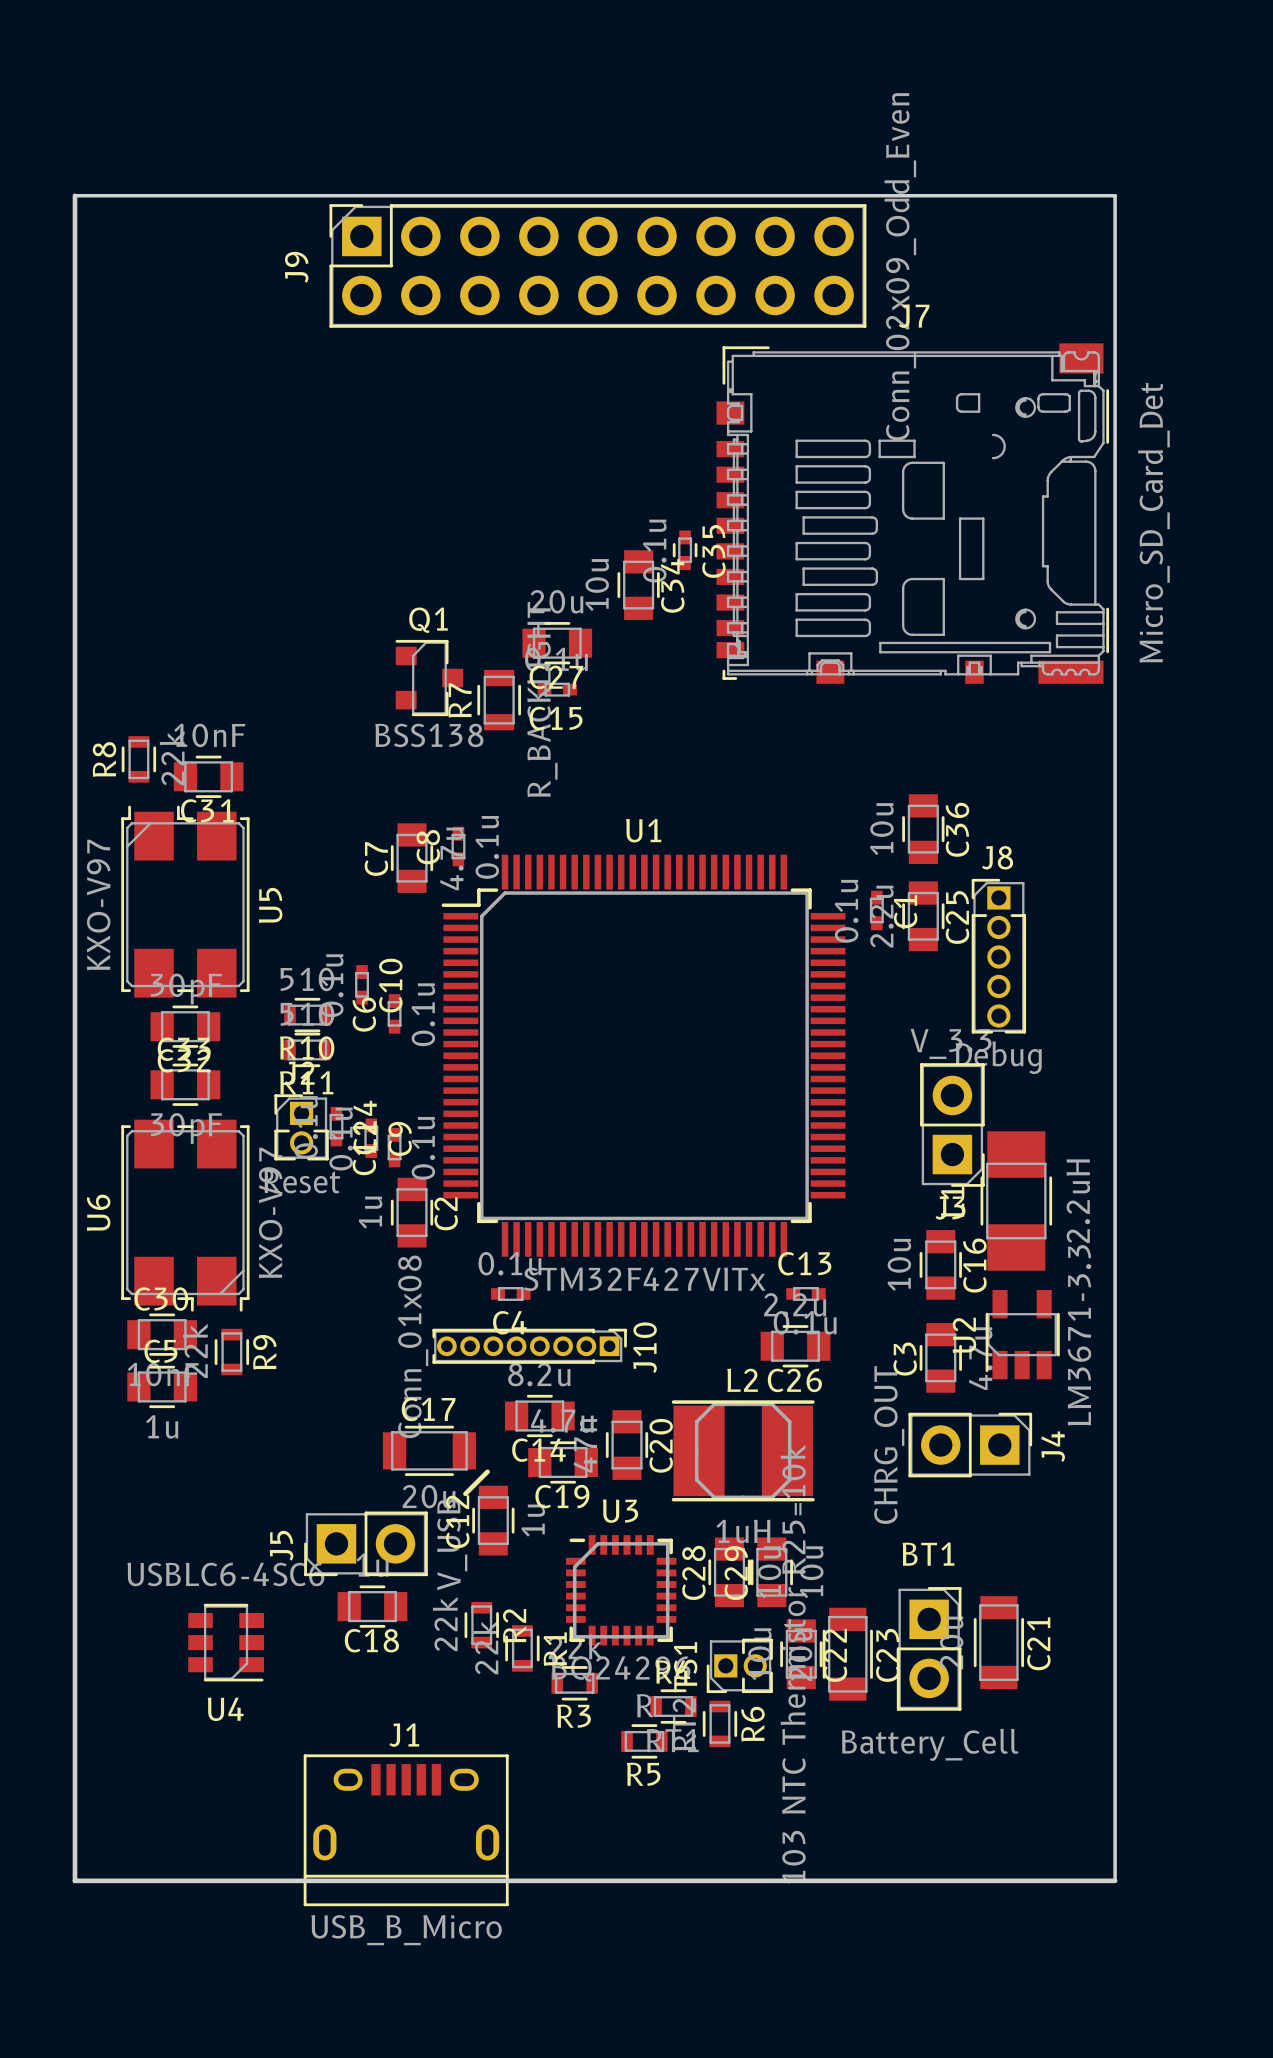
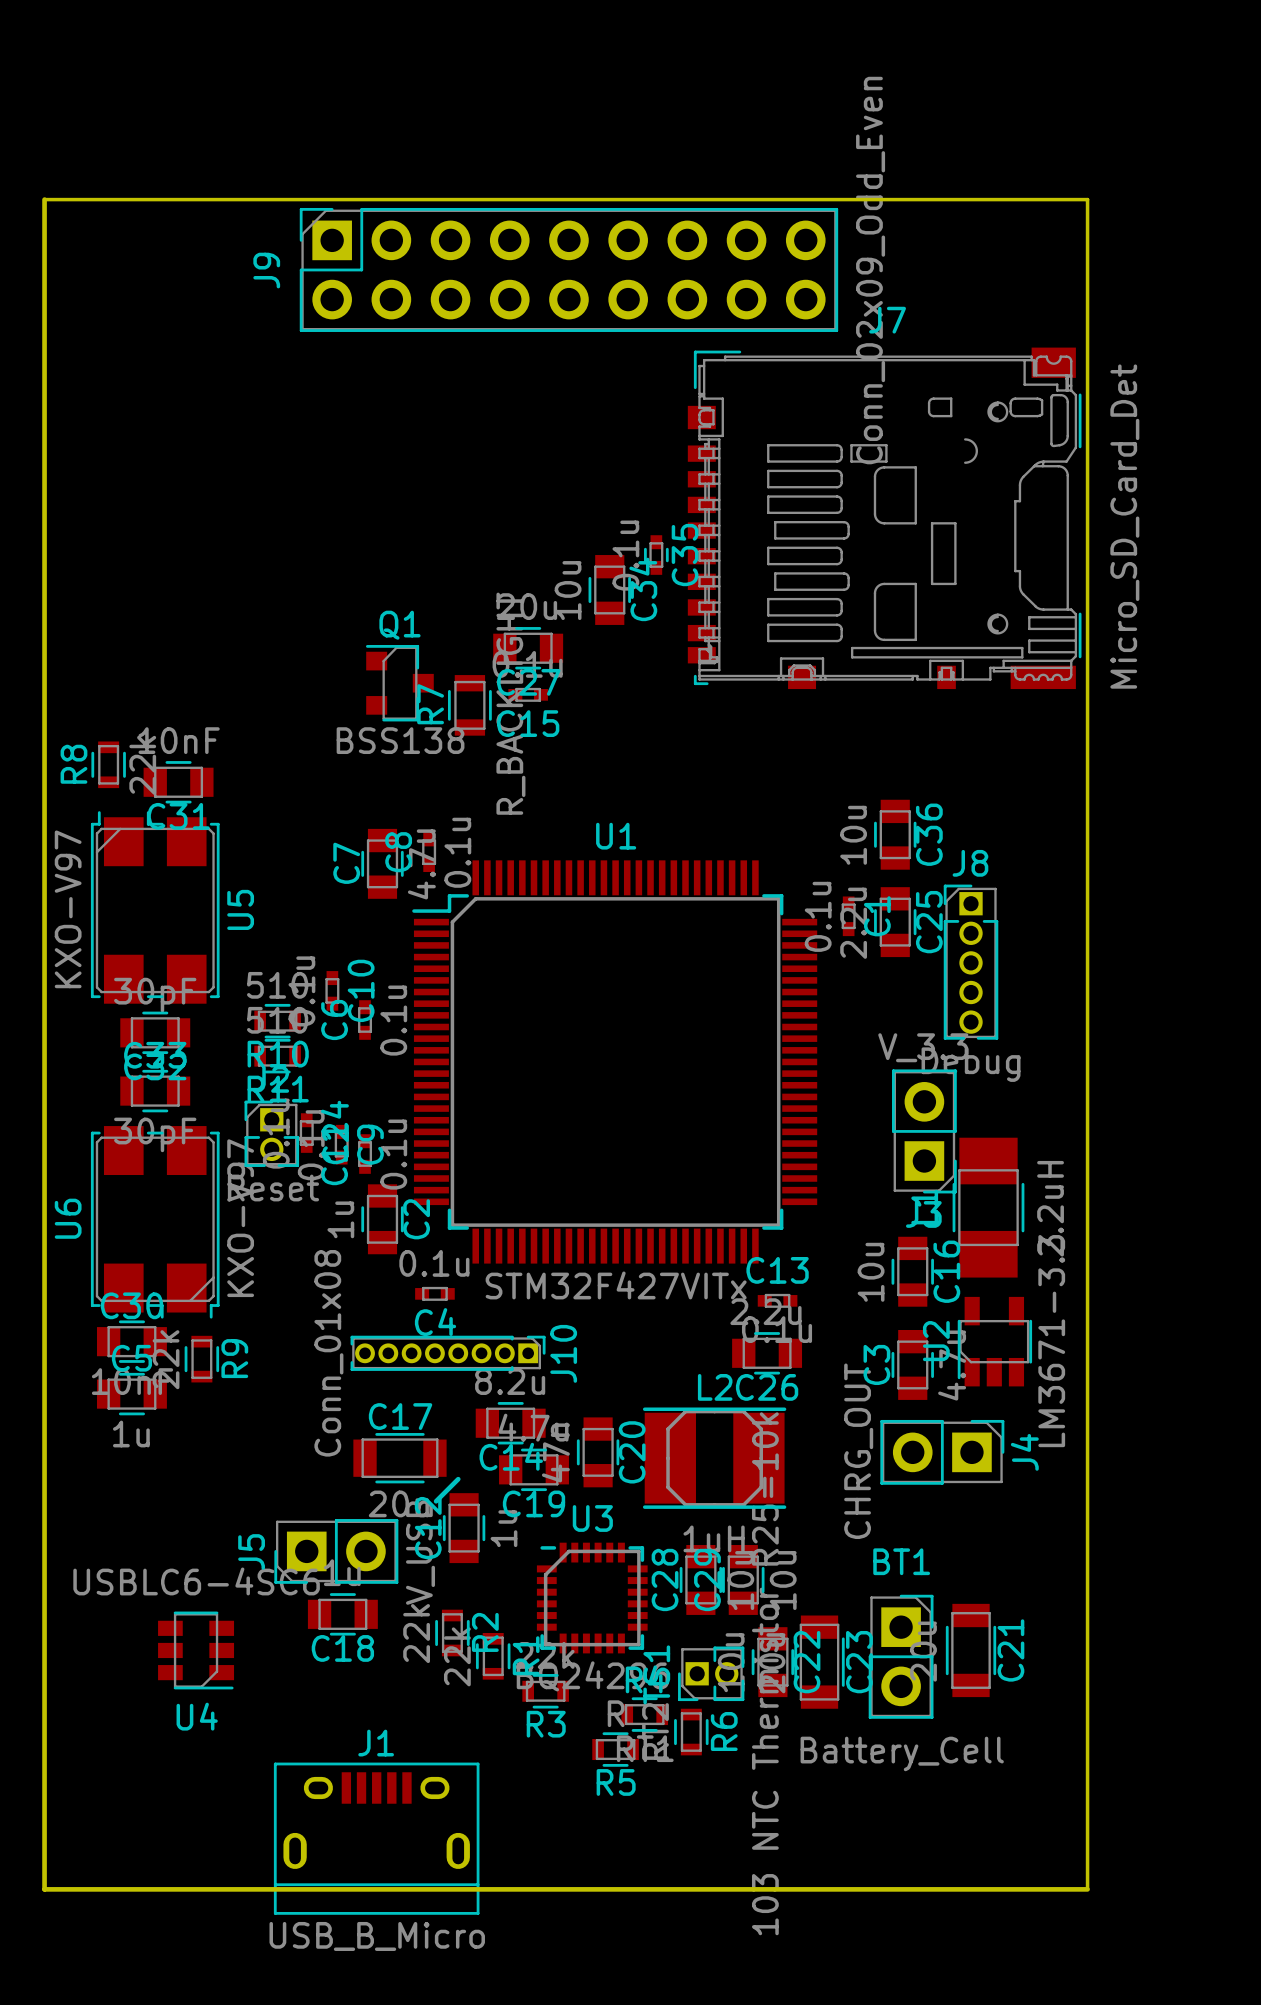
C4 position: (510, 1293) -> (434, 1293)
J10 position: (529, 1346) -> (448, 1353)

